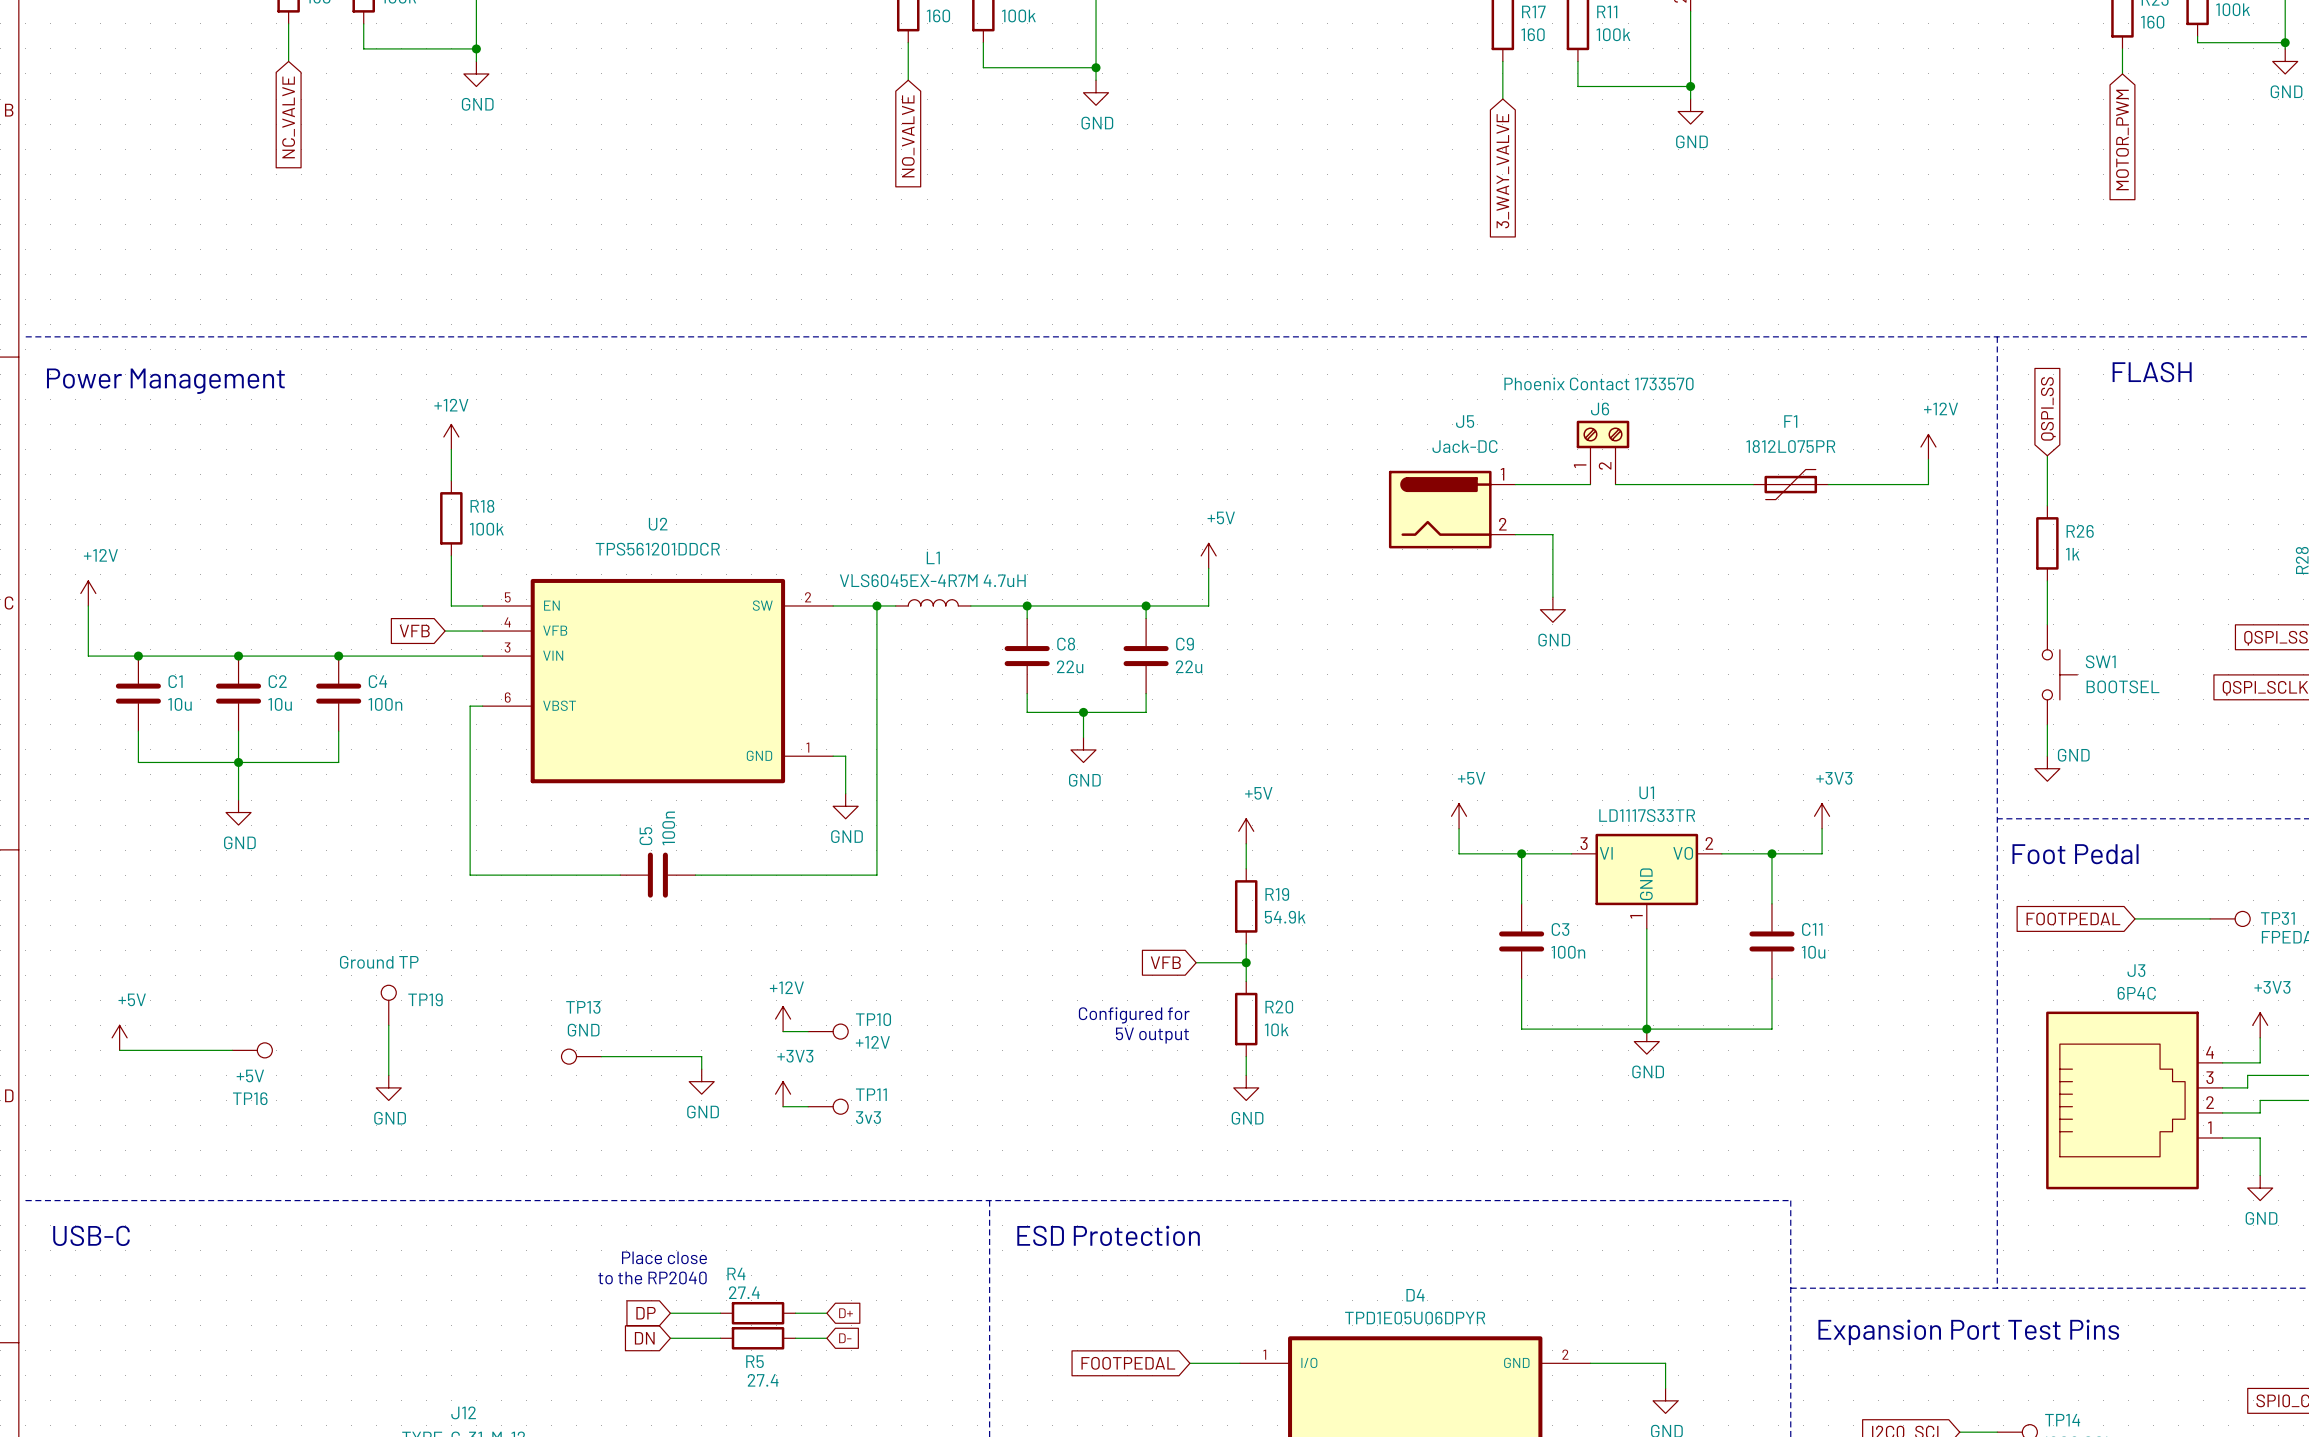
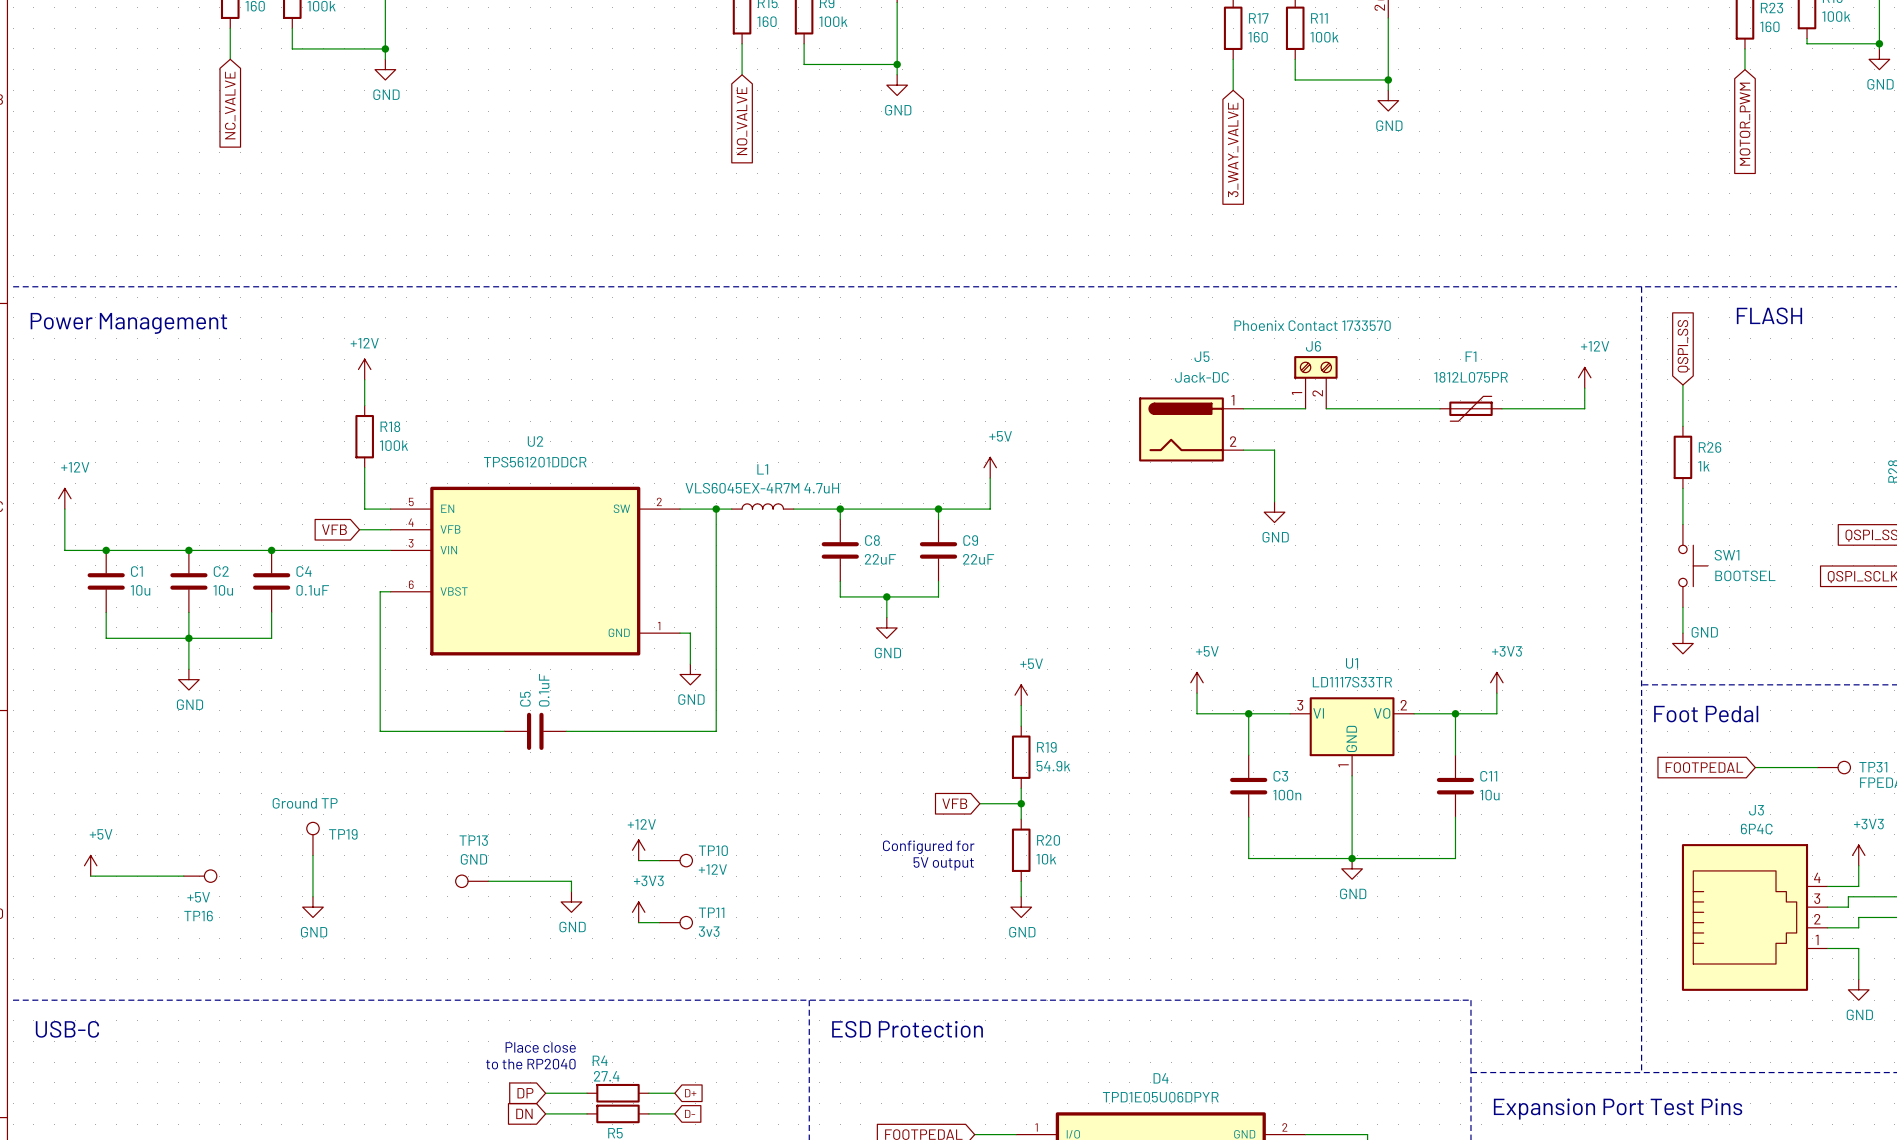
C8 value: 22u (1070, 666) -> 22uF (880, 559)
C9 value: 22u (1189, 666) -> 22uF (978, 559)
C4 value: 100n (385, 704) -> 0.1uF (312, 590)
C5 value: 100n (668, 828) -> 0.1uF (544, 690)

